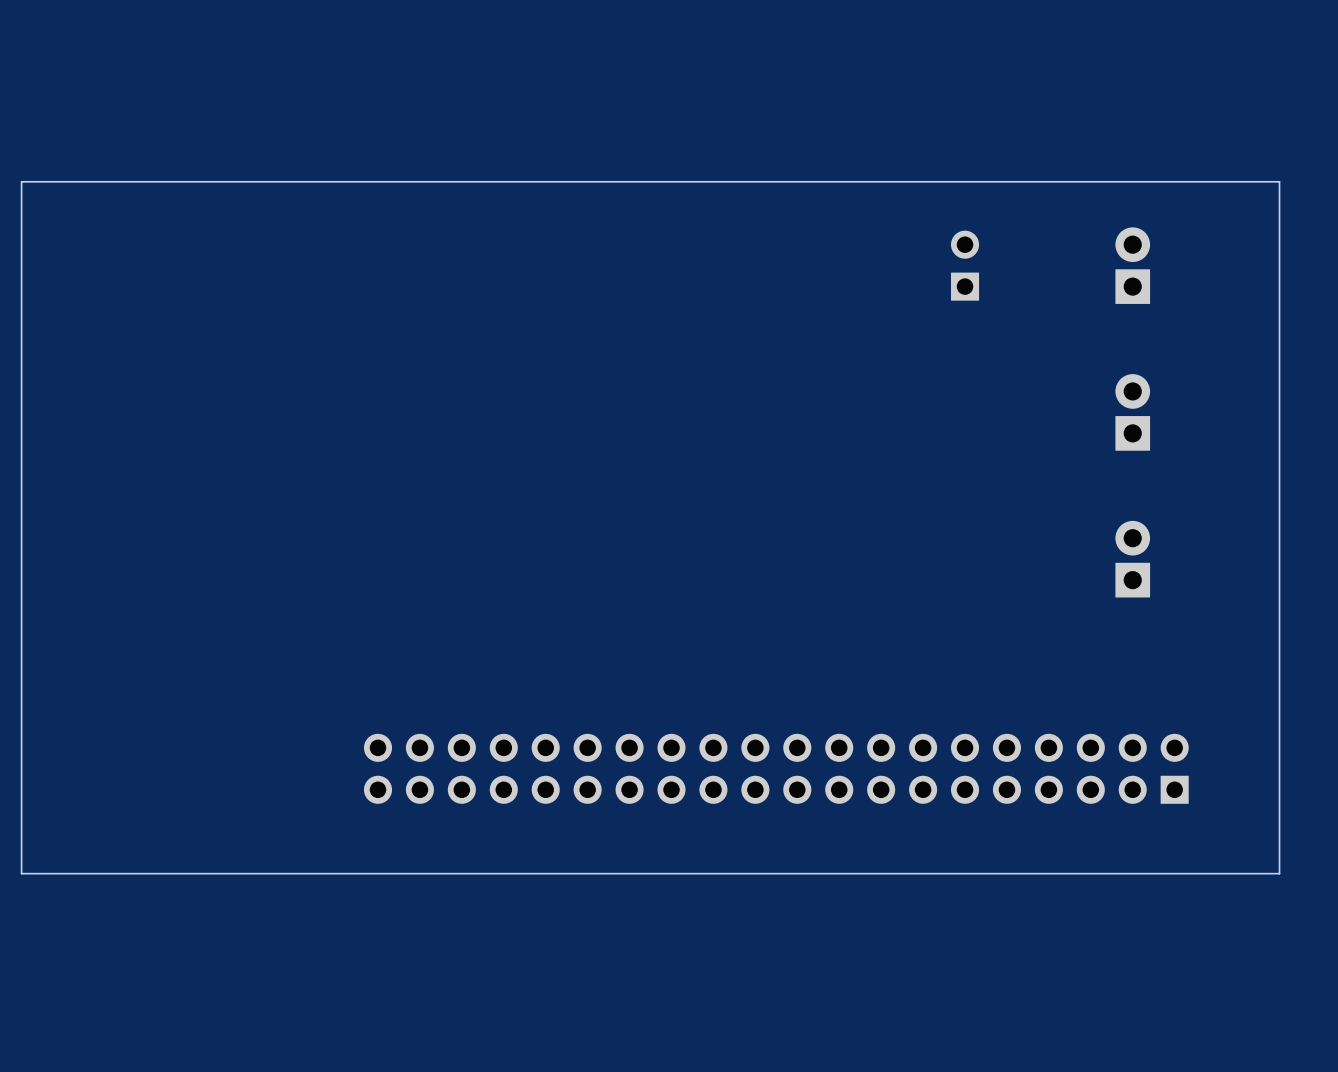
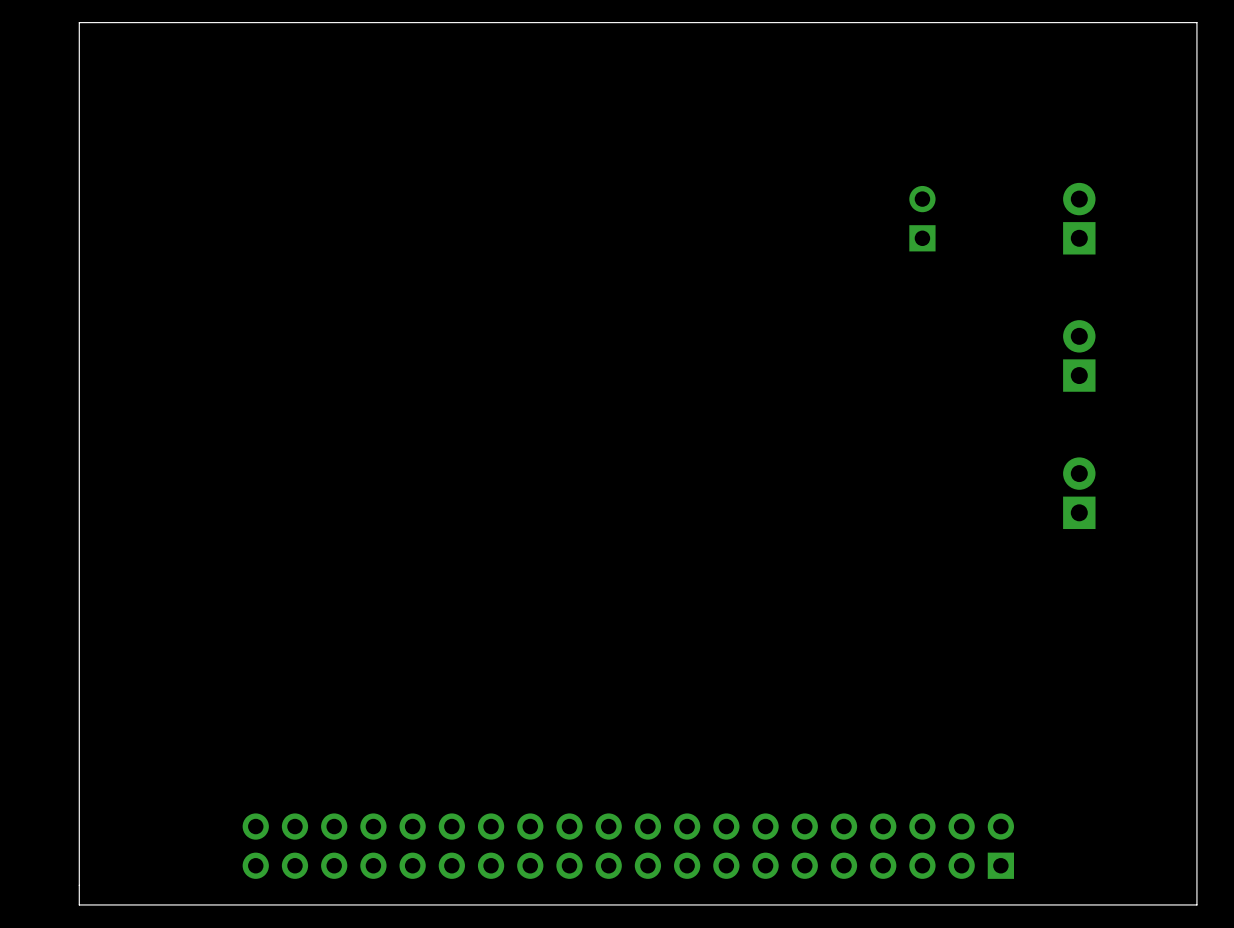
board edge: (1279, 181) (1279, 873) (21, 873) (21, 181) (1279, 181) -> (1196, 22) (1196, 904) (79, 904) (79, 22) (1196, 22)
part position: (776, 768) -> (628, 846)

